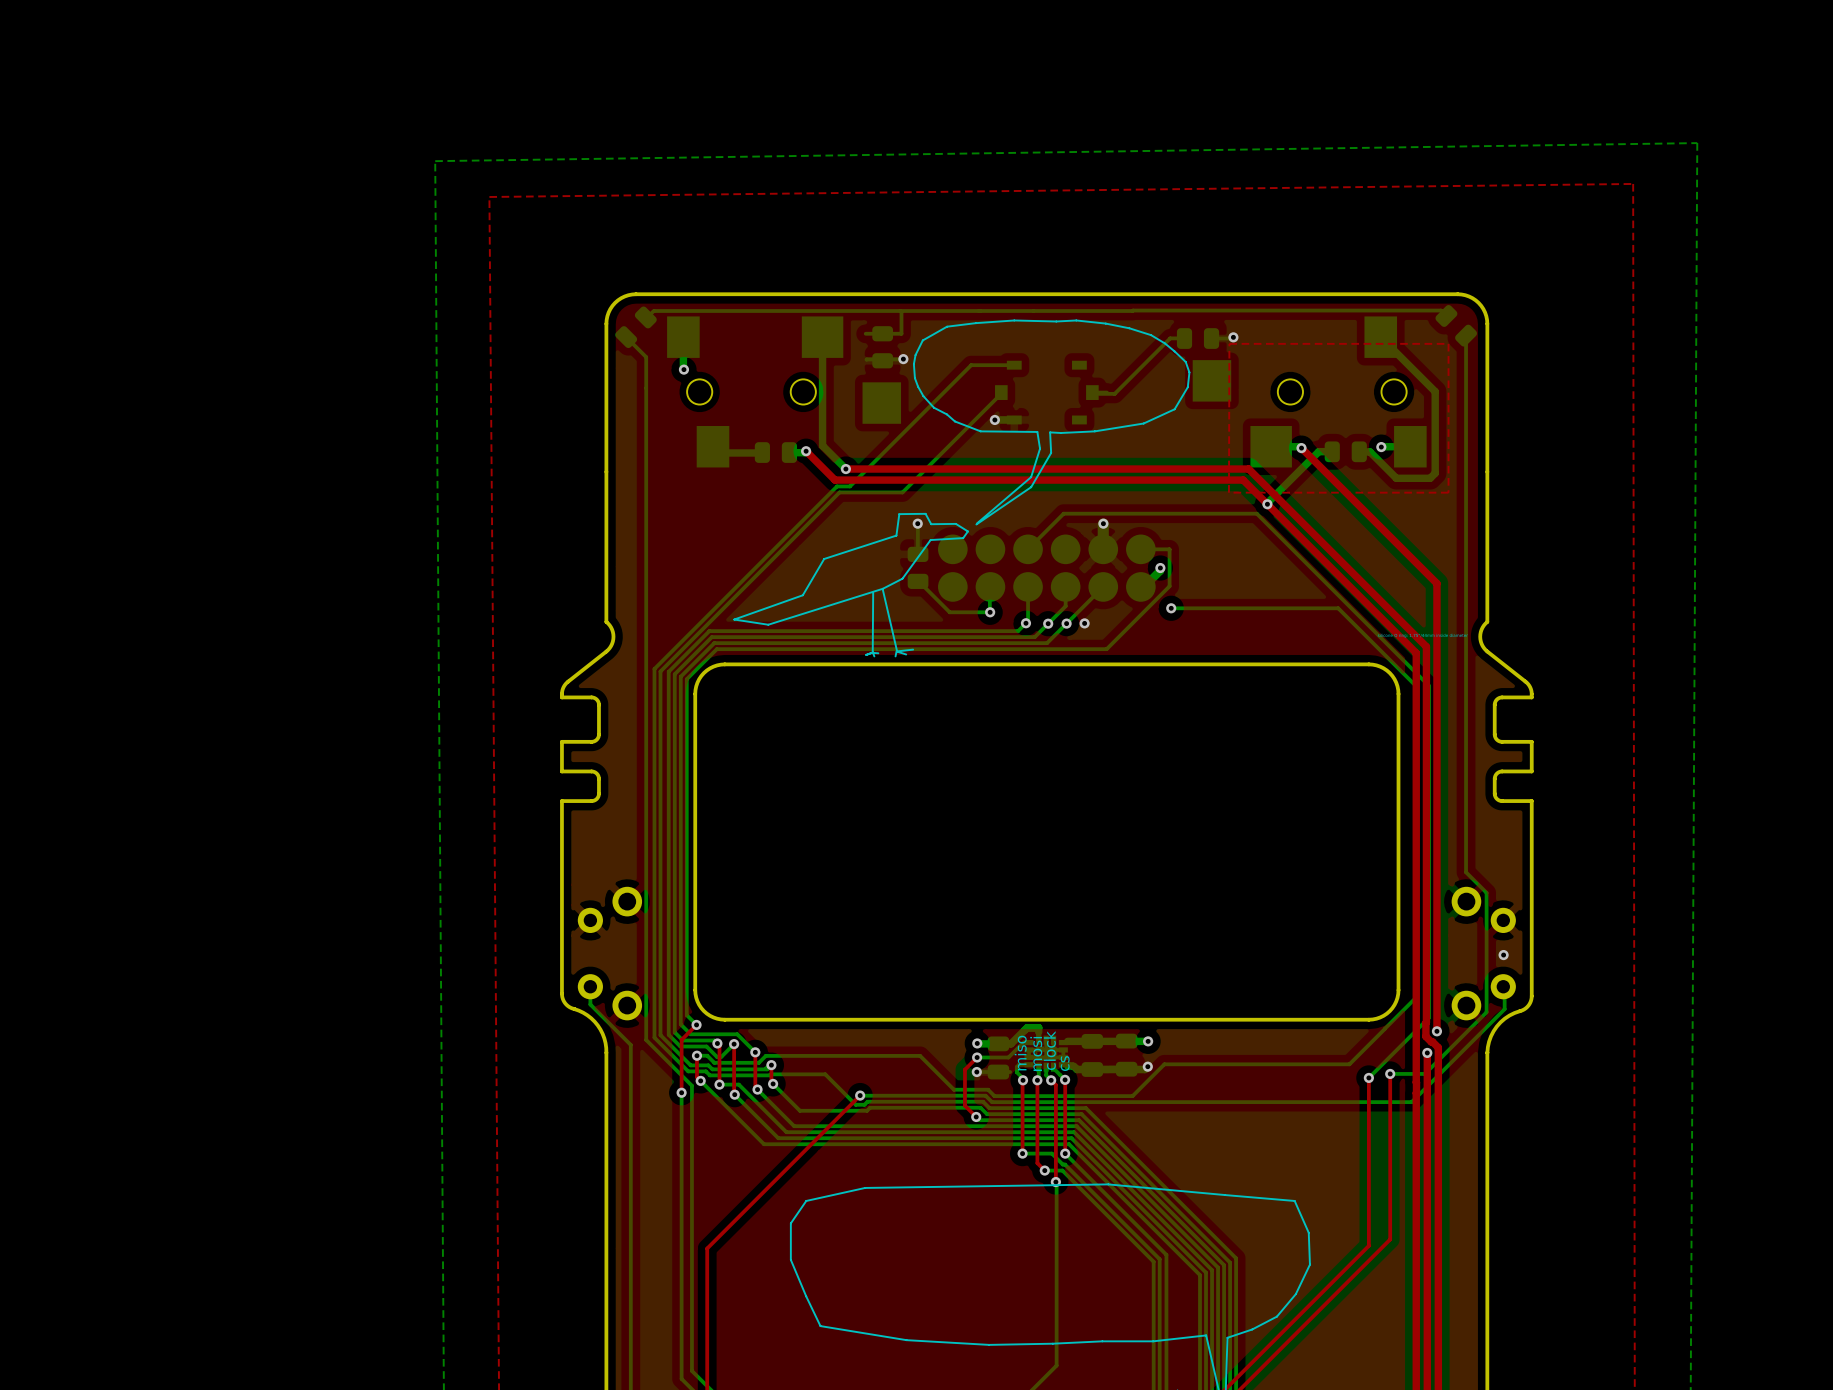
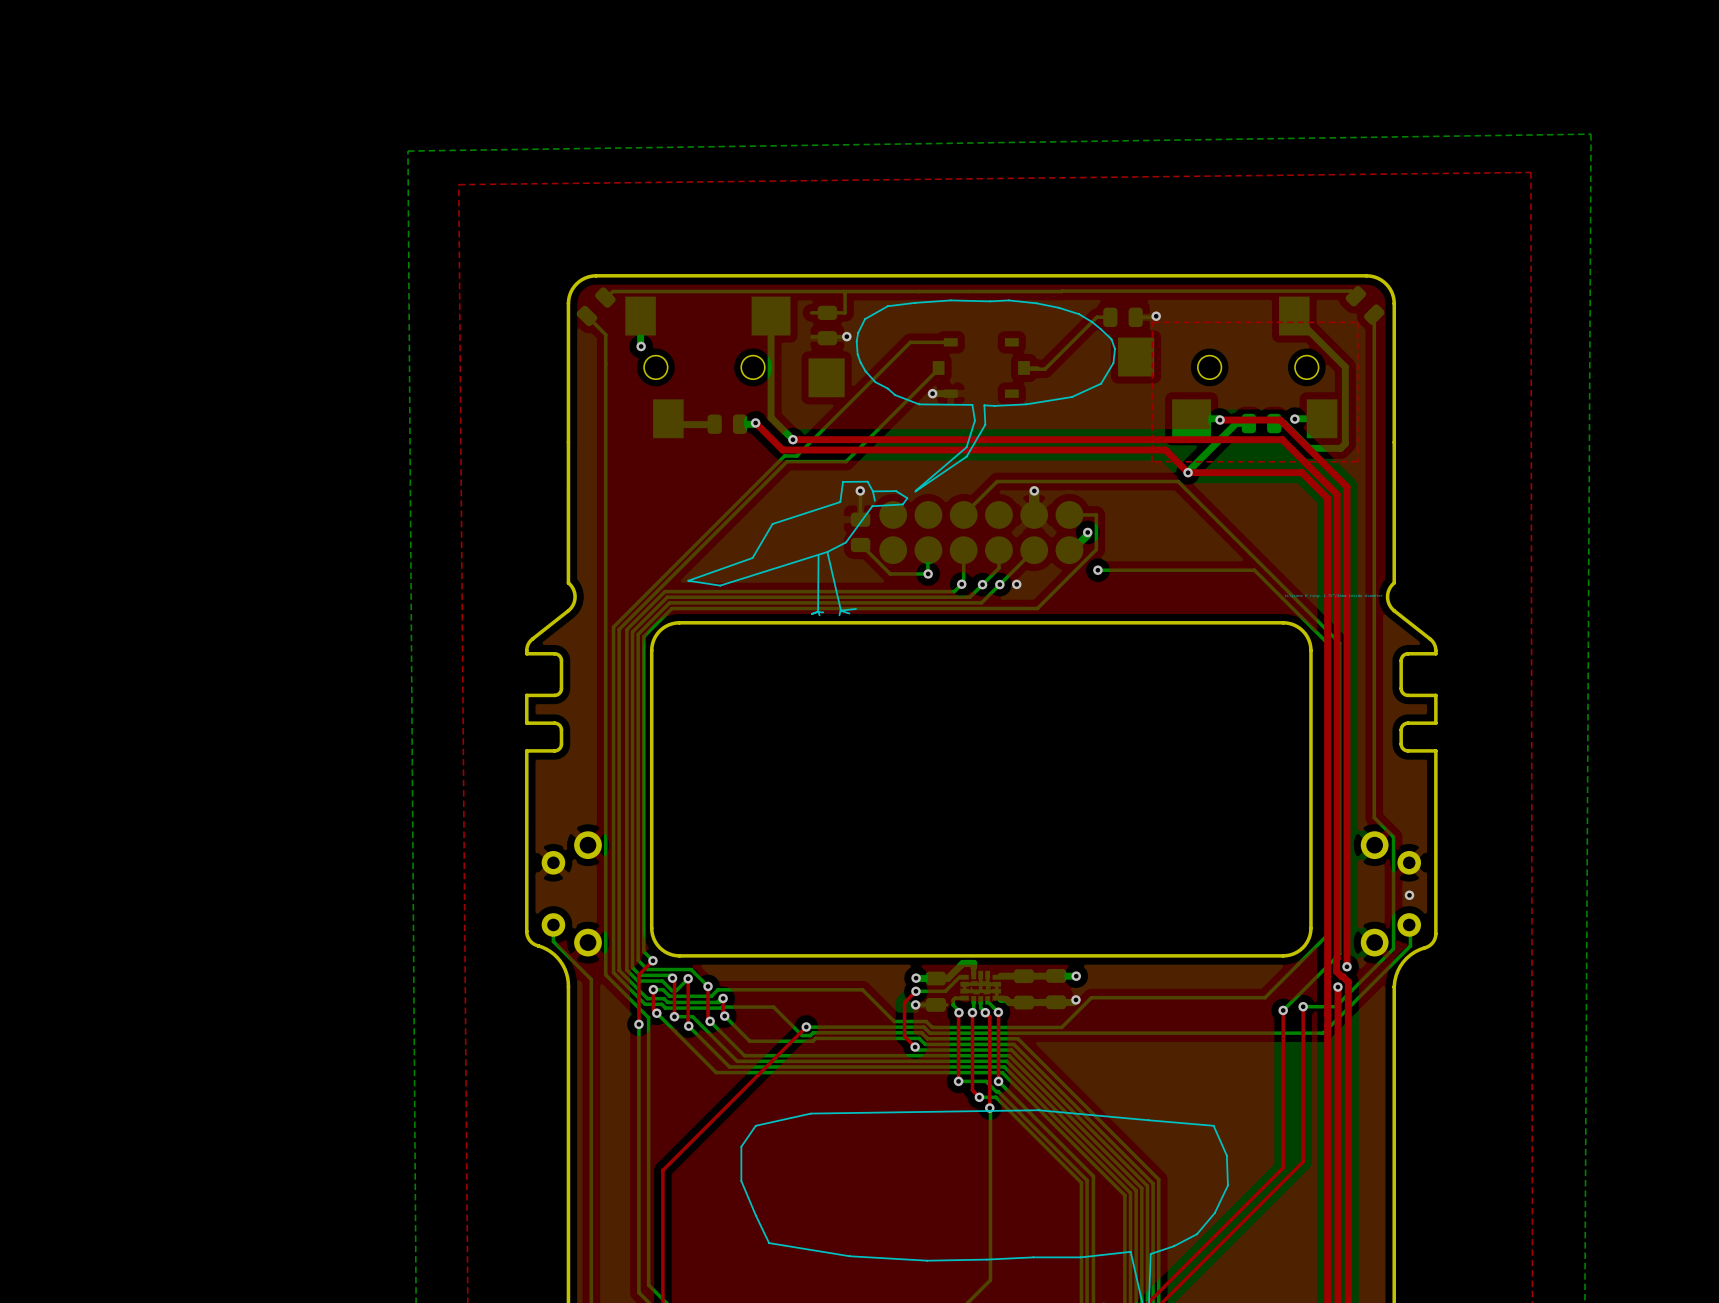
top track: (1301, 448) (1436, 583) -> (1220, 420) (1280, 420) (1347, 486) (1347, 547)
top track: (1248, 469) (1426, 646) -> (1170, 439) (1282, 439) (1337, 494) (1337, 606)
top track: (1267, 504) (1416, 653) -> (1188, 472) (1301, 472) (1327, 498) (1327, 612)
line: none -> (872, 491) (874, 500)
text: clock (1049, 1050) -> none
text: miso (1020, 1053) -> none
text: mosi (1036, 1053) -> none
text: cs (1065, 1063) -> none

